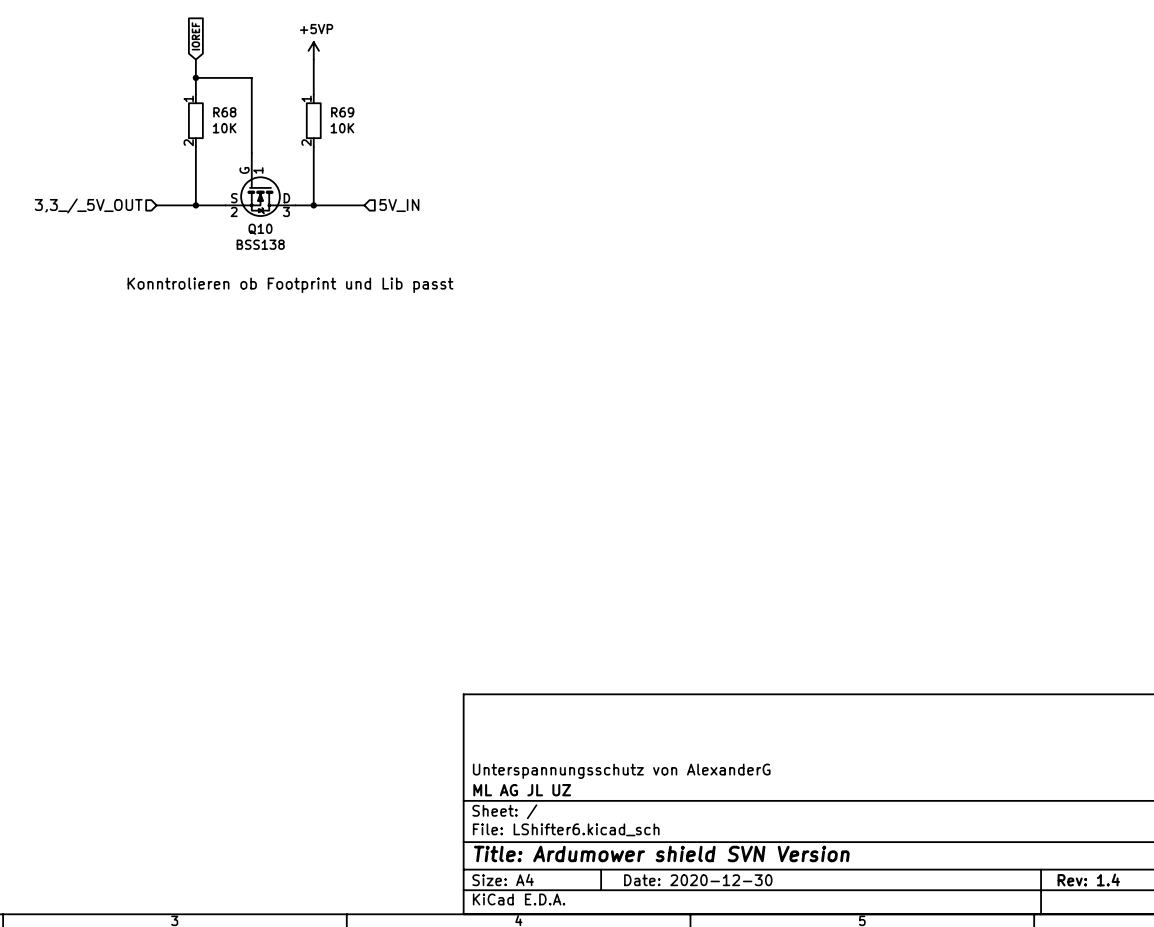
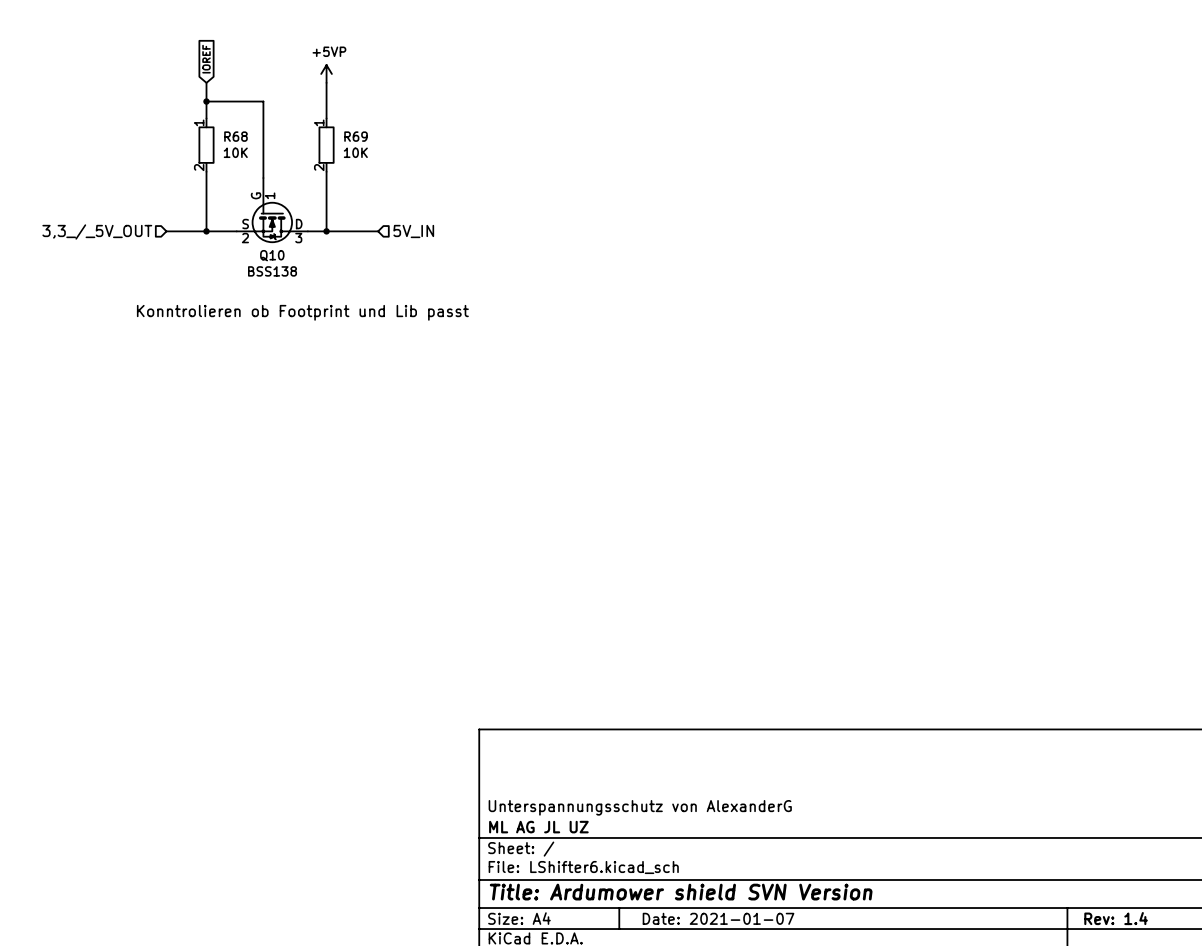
title block: Date: 2020-12-30 (698, 880) -> Date: 2021-01-07 (718, 918)

